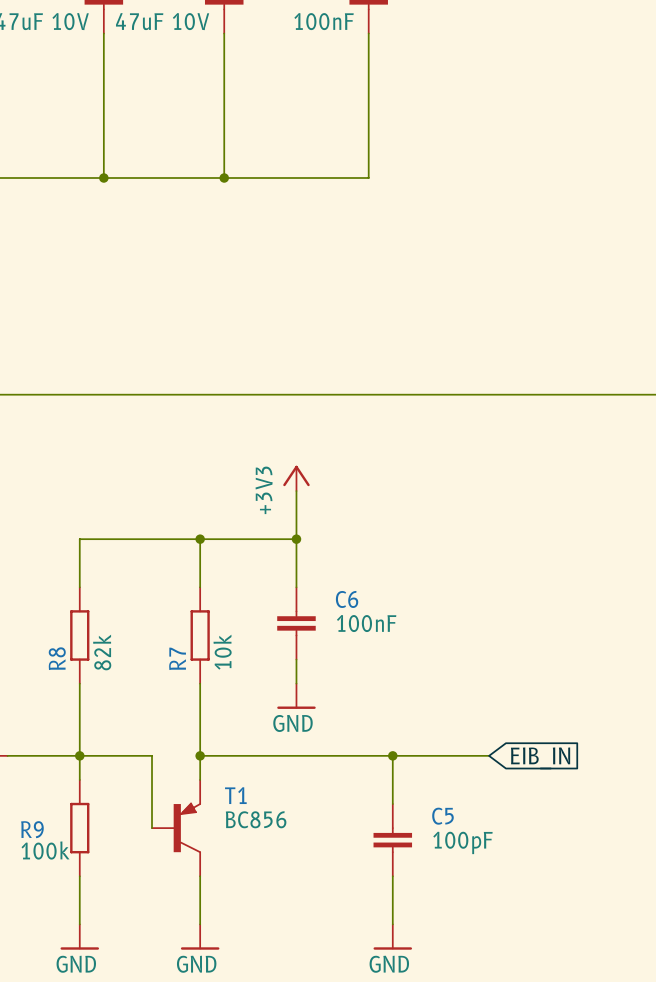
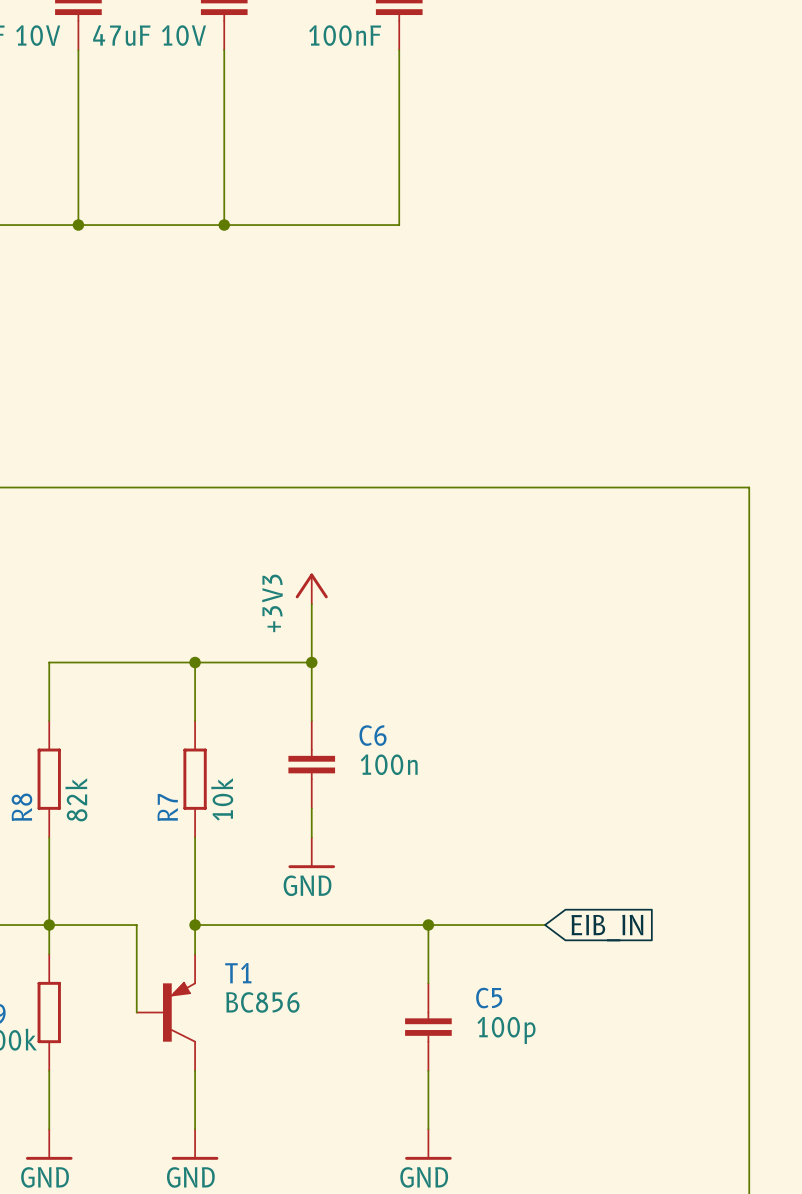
C6 value: 100nF (366, 623) -> 100n (389, 764)
C5 value: 100pF (462, 842) -> 100p (506, 1030)

